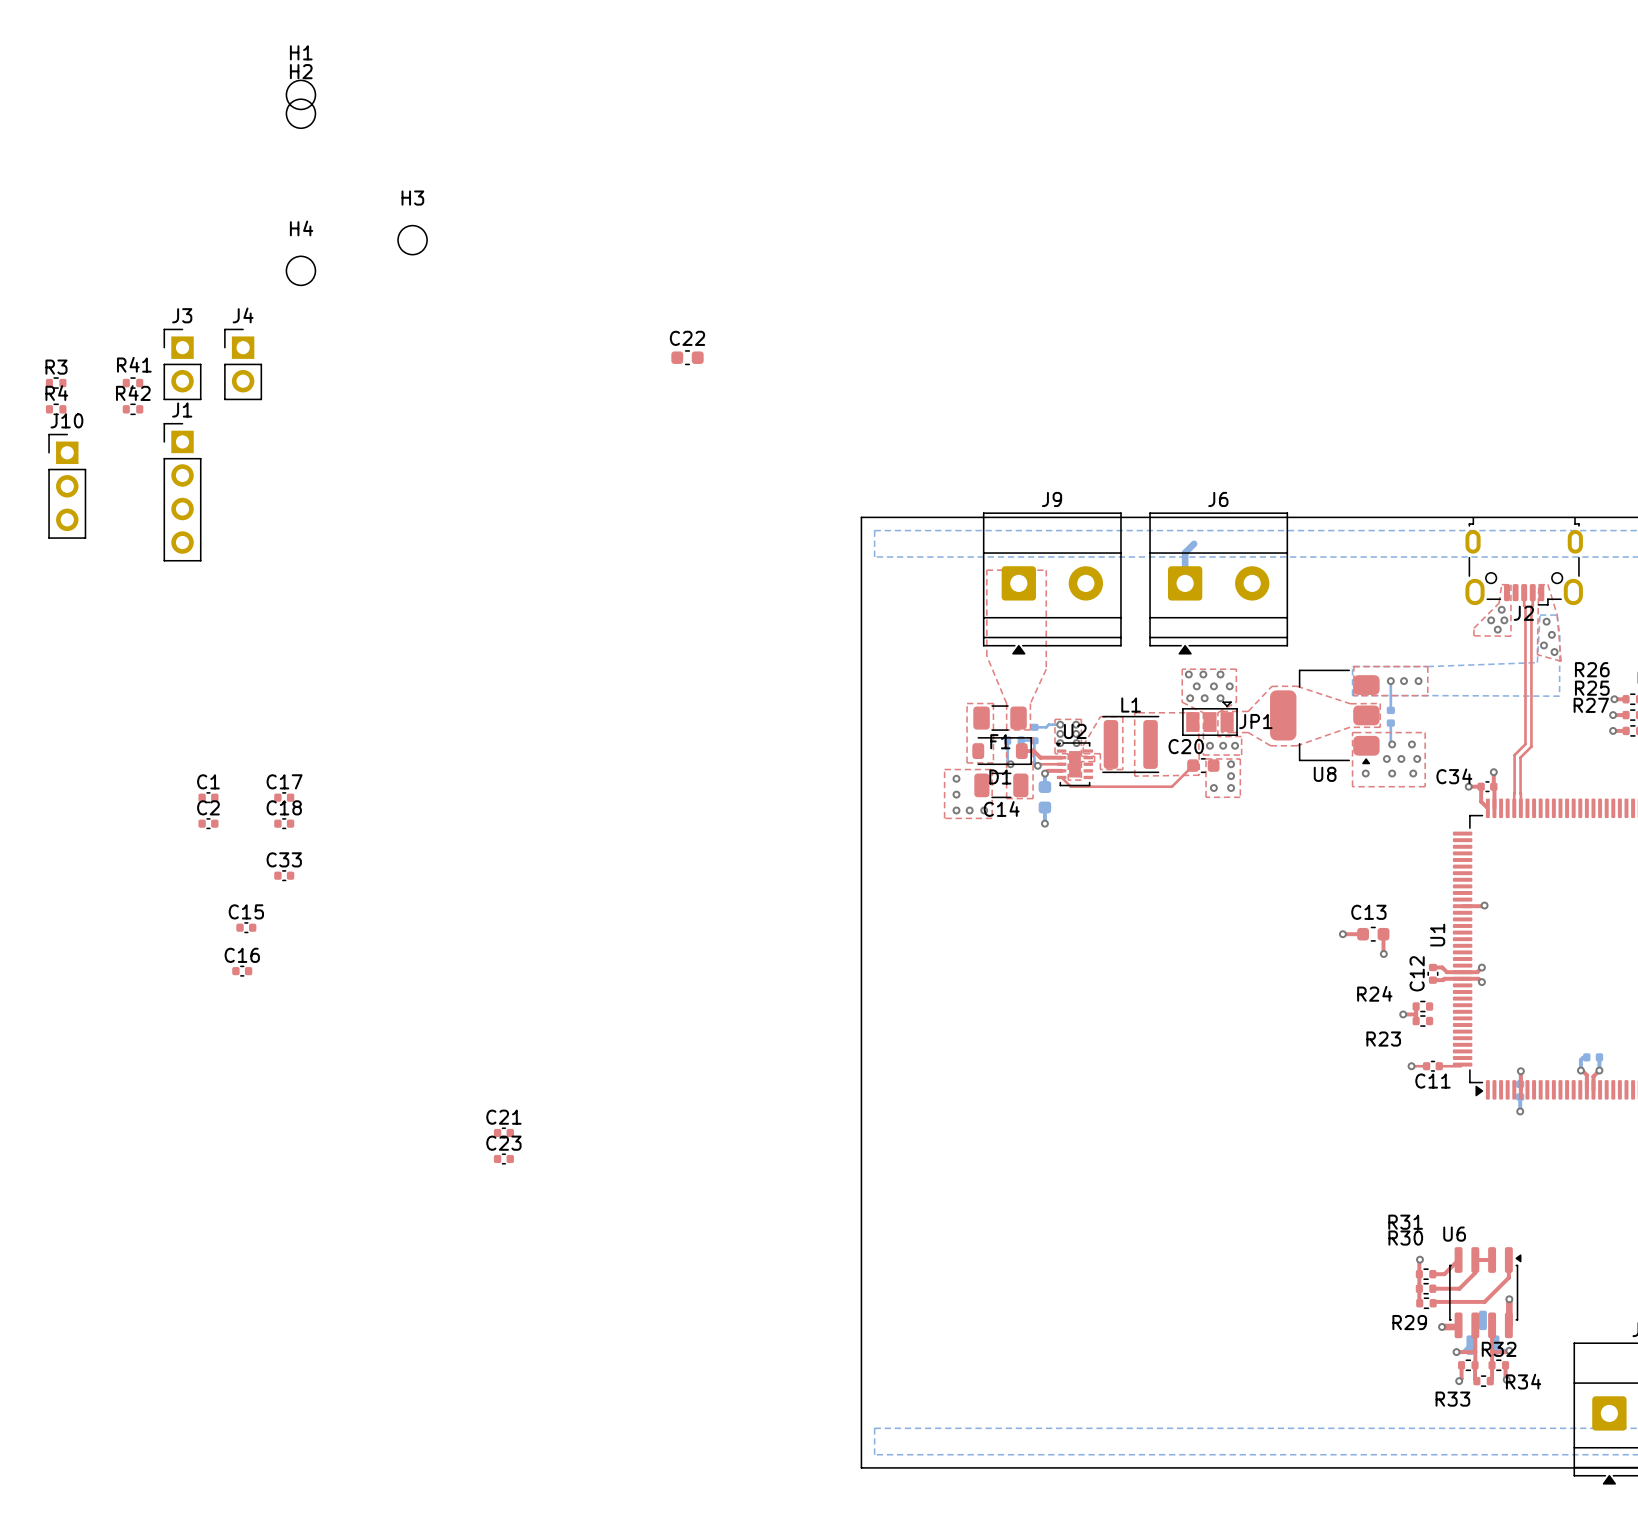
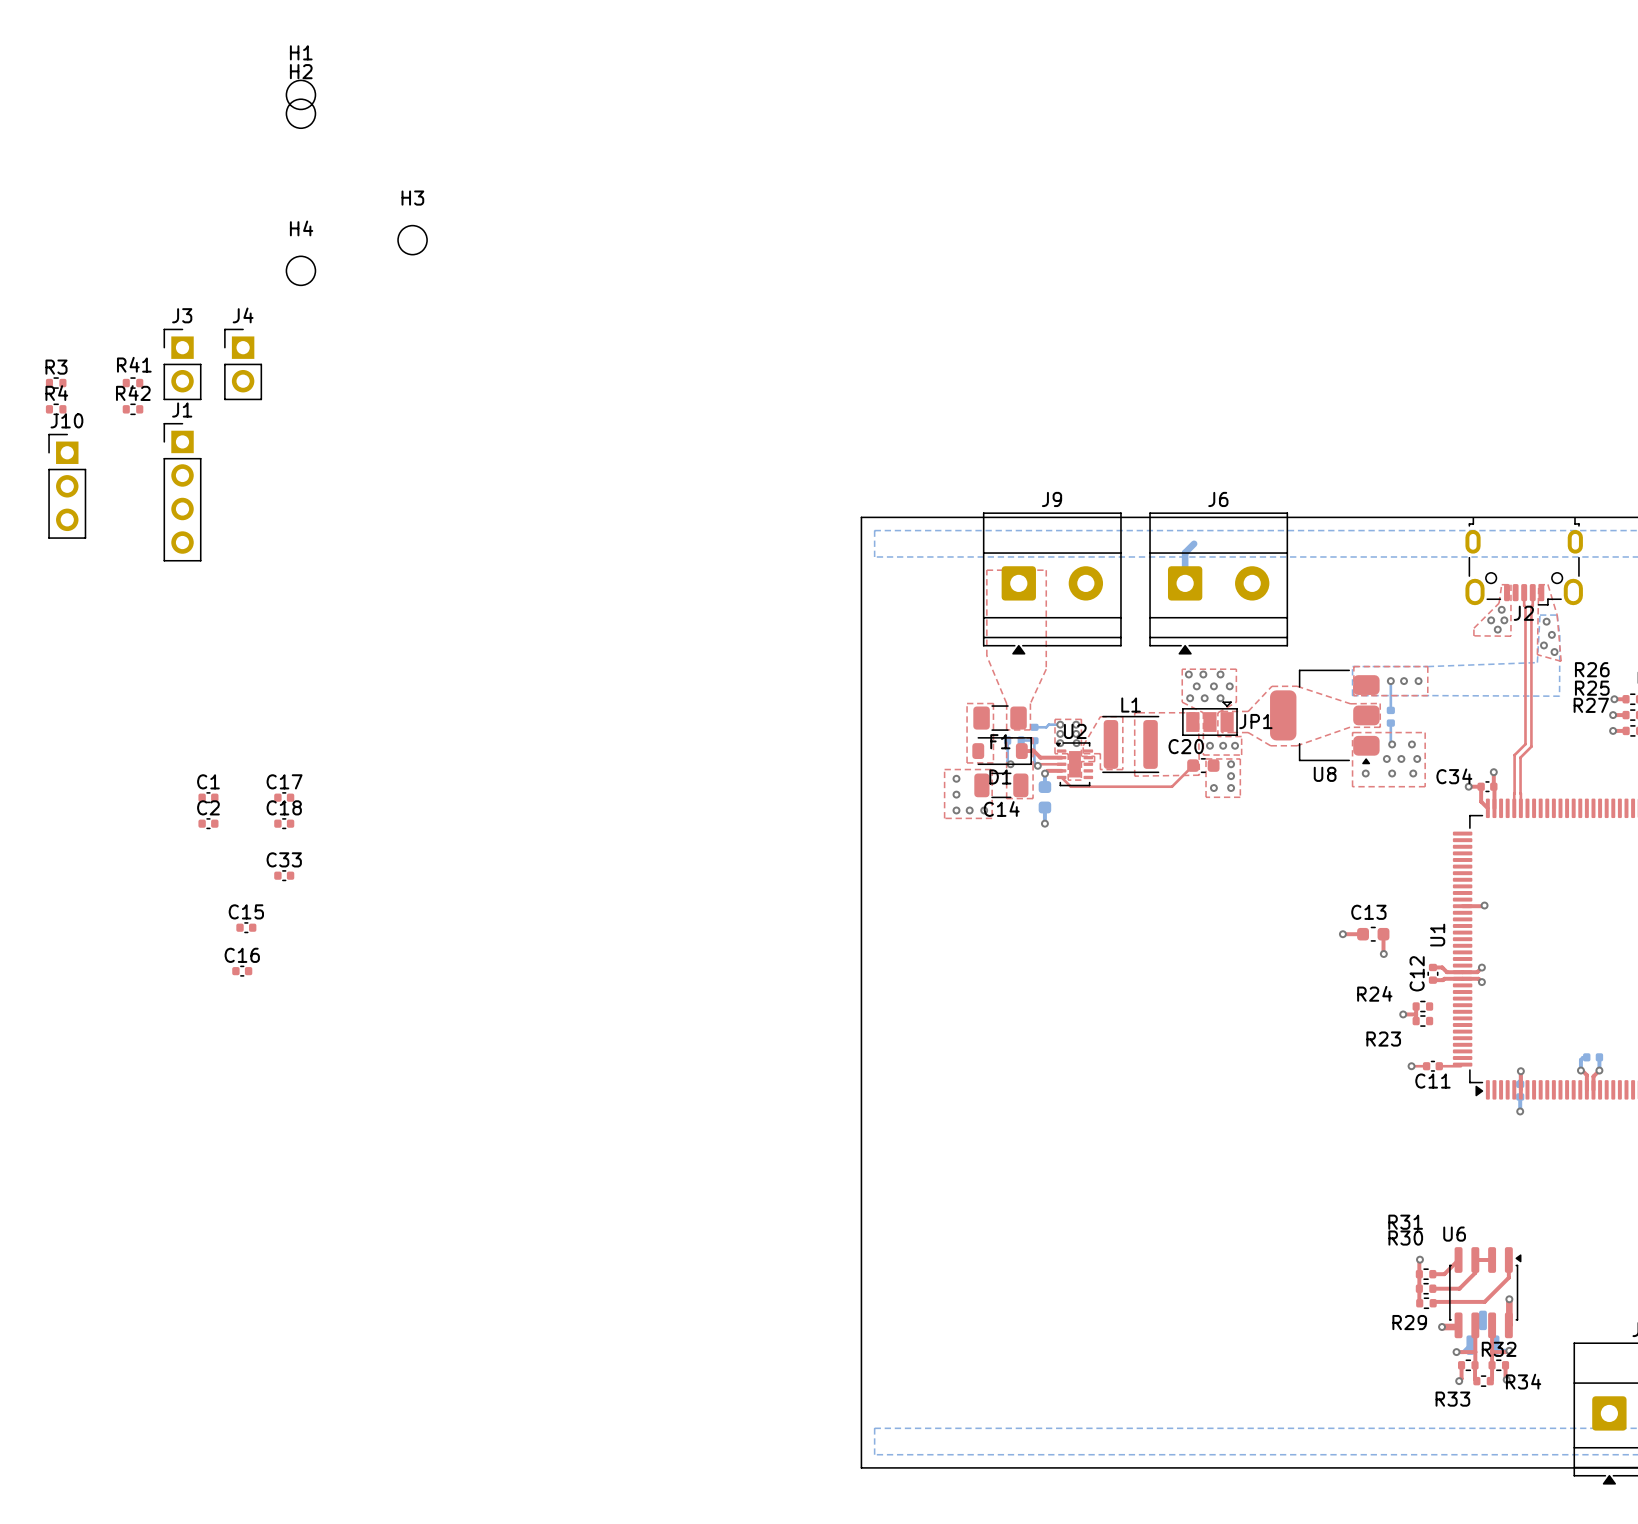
C22: (687, 357) -> none
C21: (503, 1132) -> none
C23: (503, 1159) -> none

